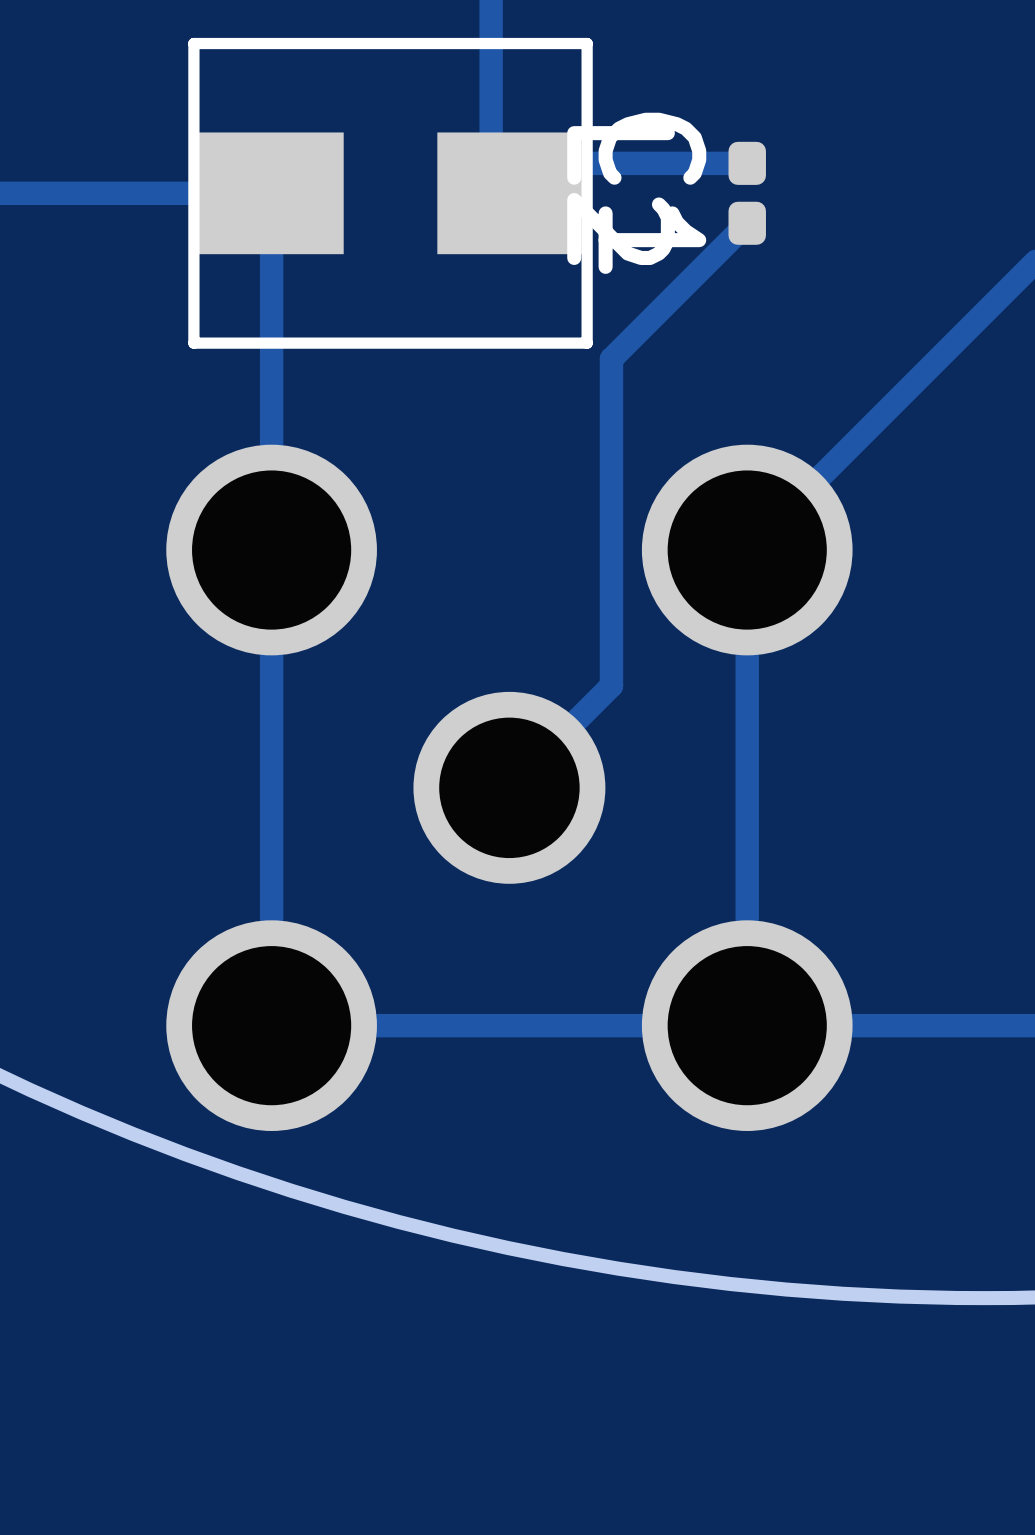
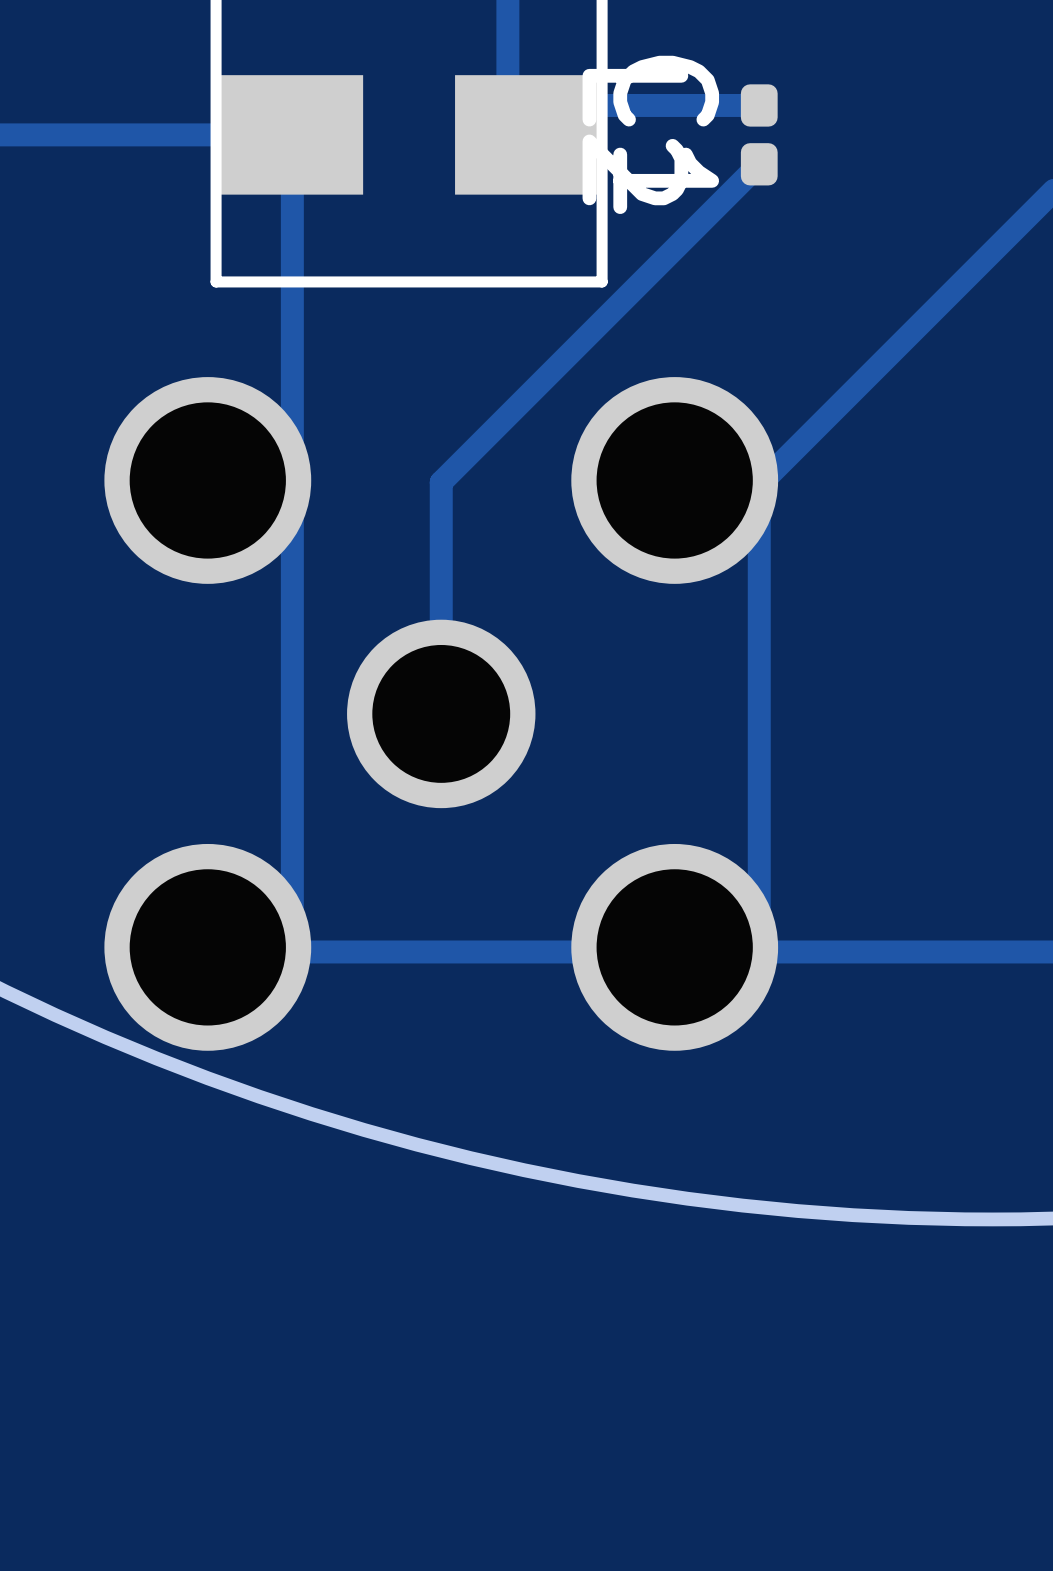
track: (611, 359) (611, 685) (509, 787) -> (625, 297) (441, 482) (441, 713)
part position: (509, 787) -> (441, 713)

